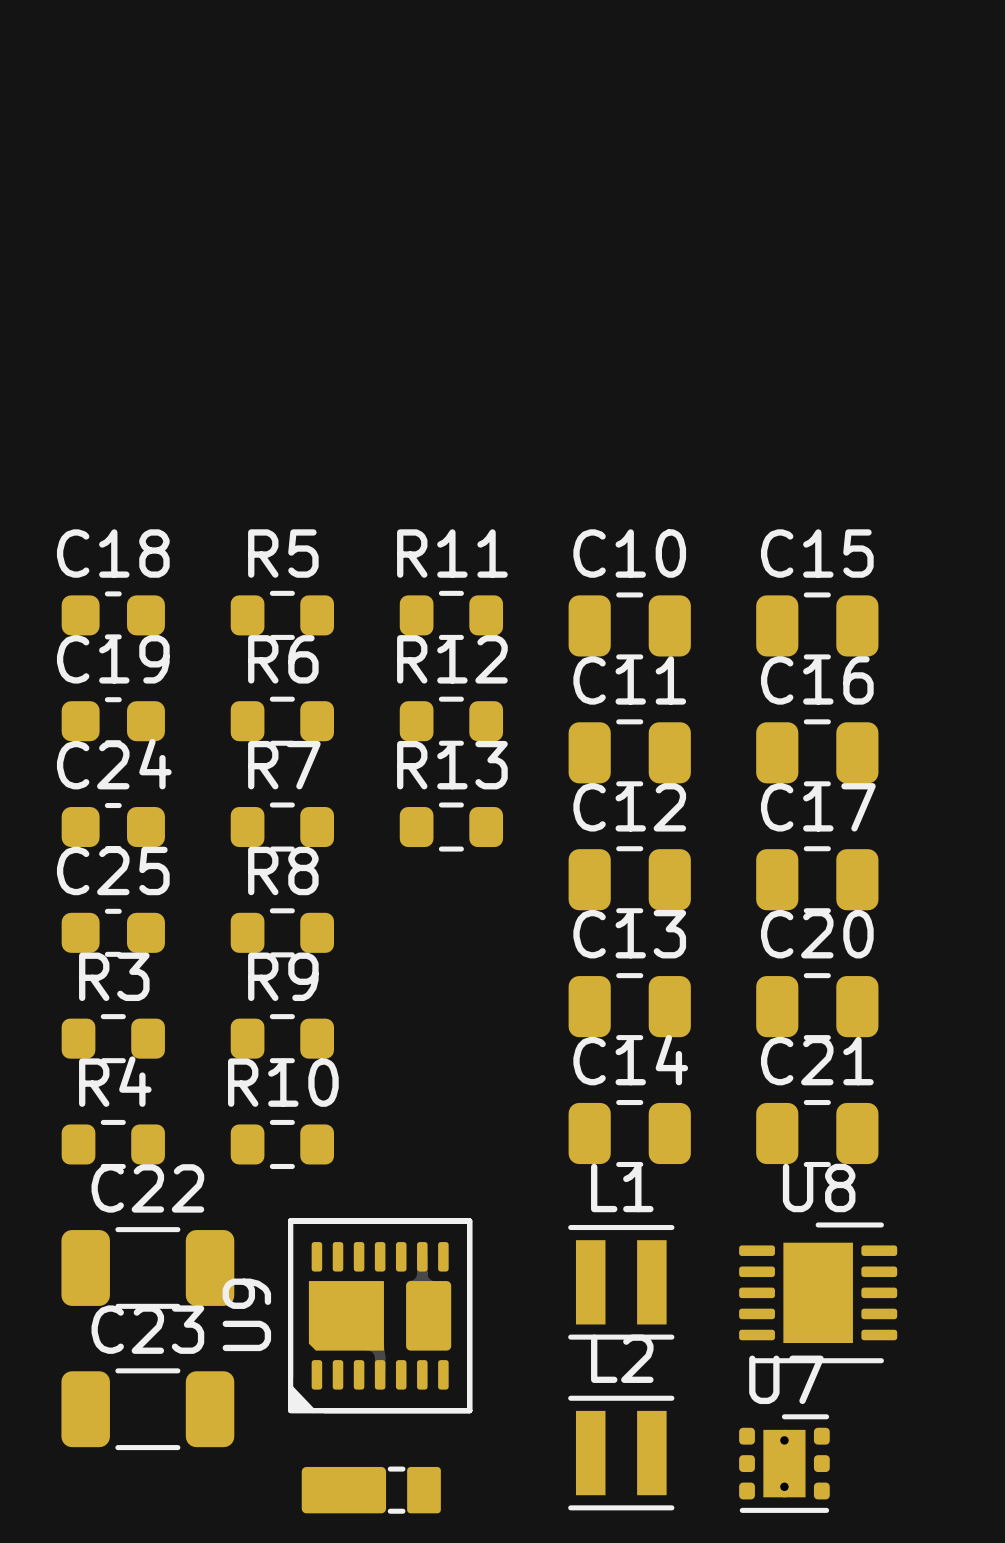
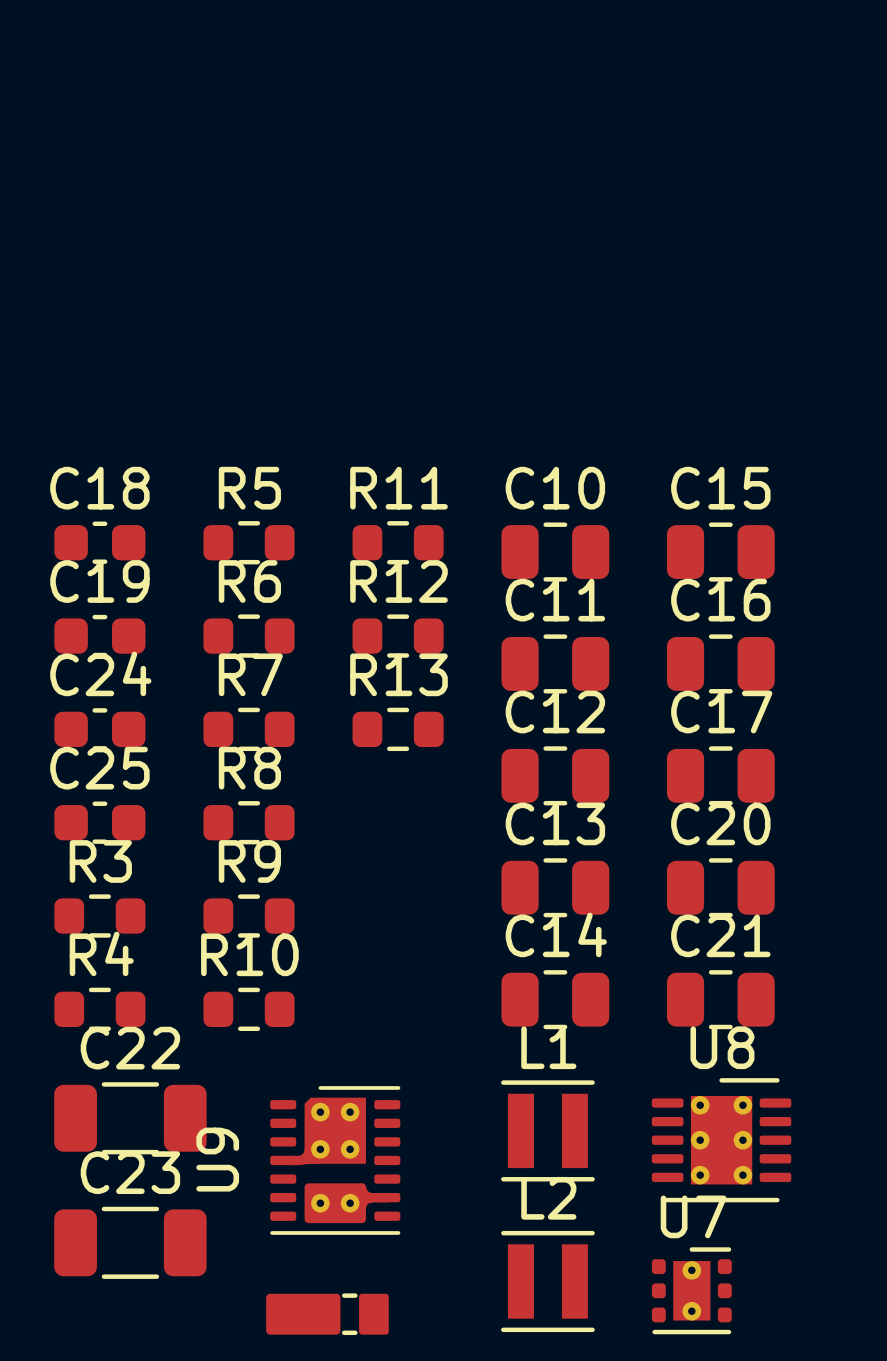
U9 footprint: [288, 1218, 473, 1414] -> [270, 1086, 401, 1235]
U8 footprint: [739, 1222, 898, 1364] -> [651, 1078, 792, 1203]

